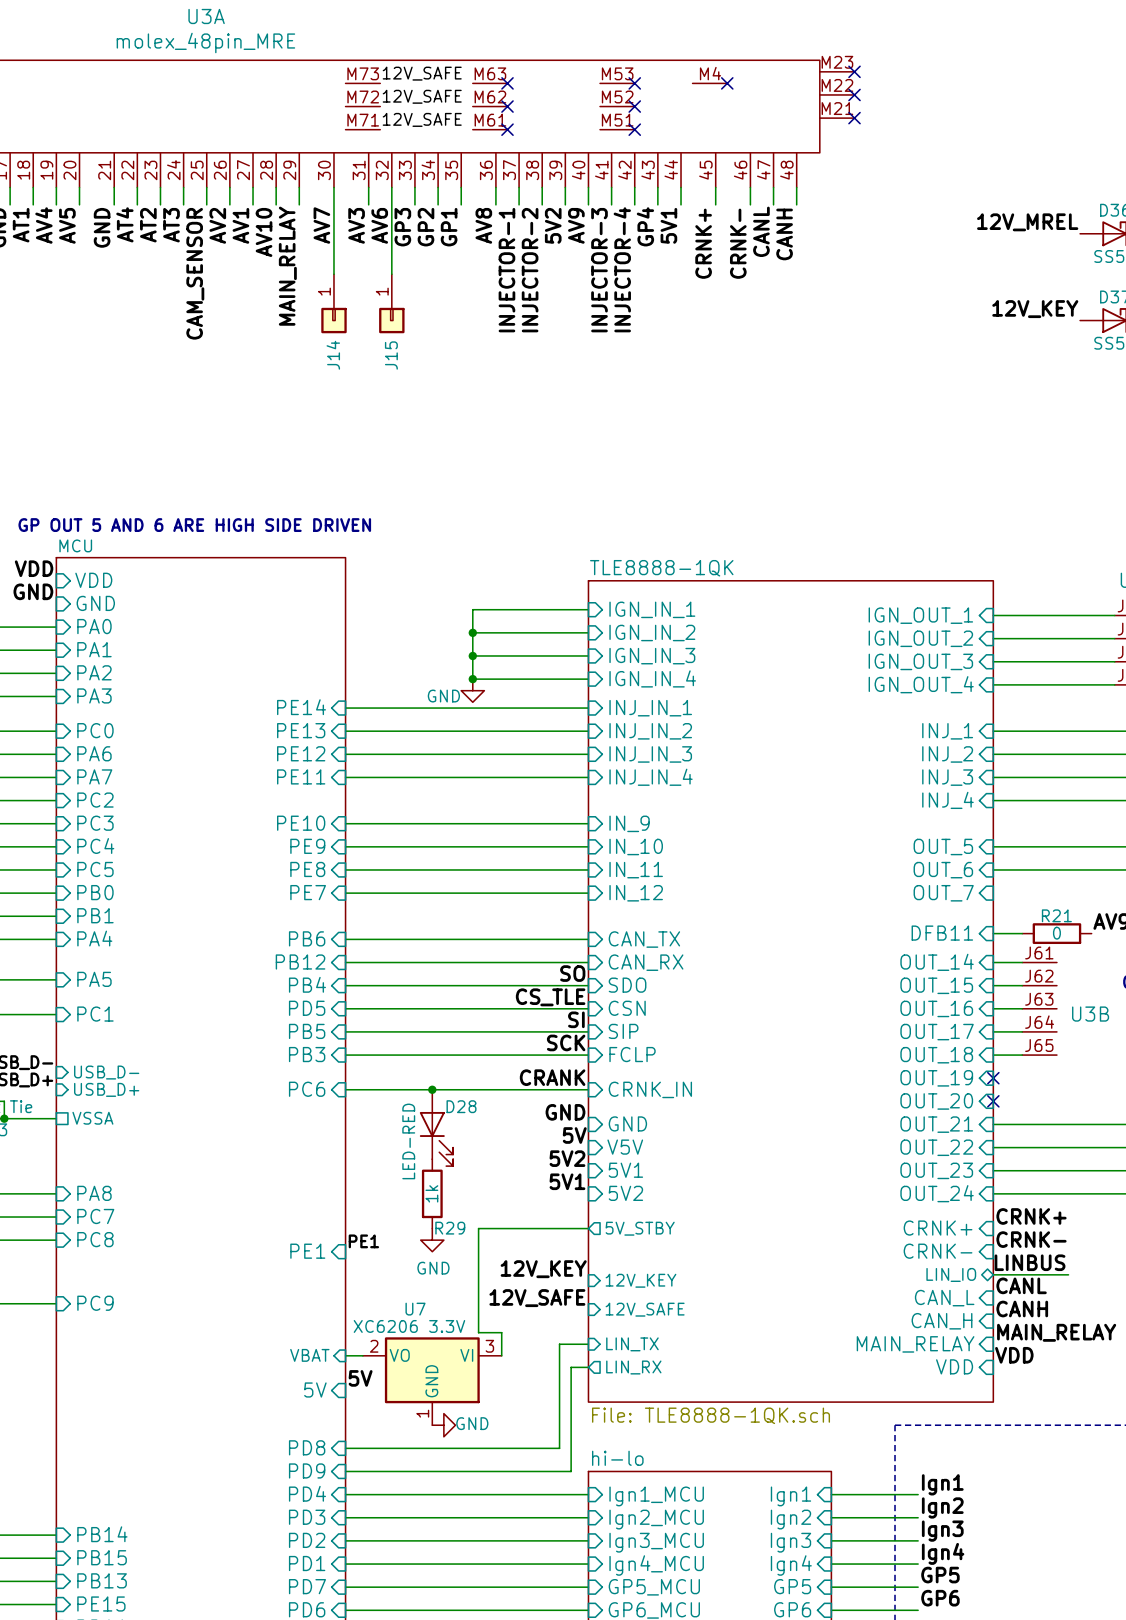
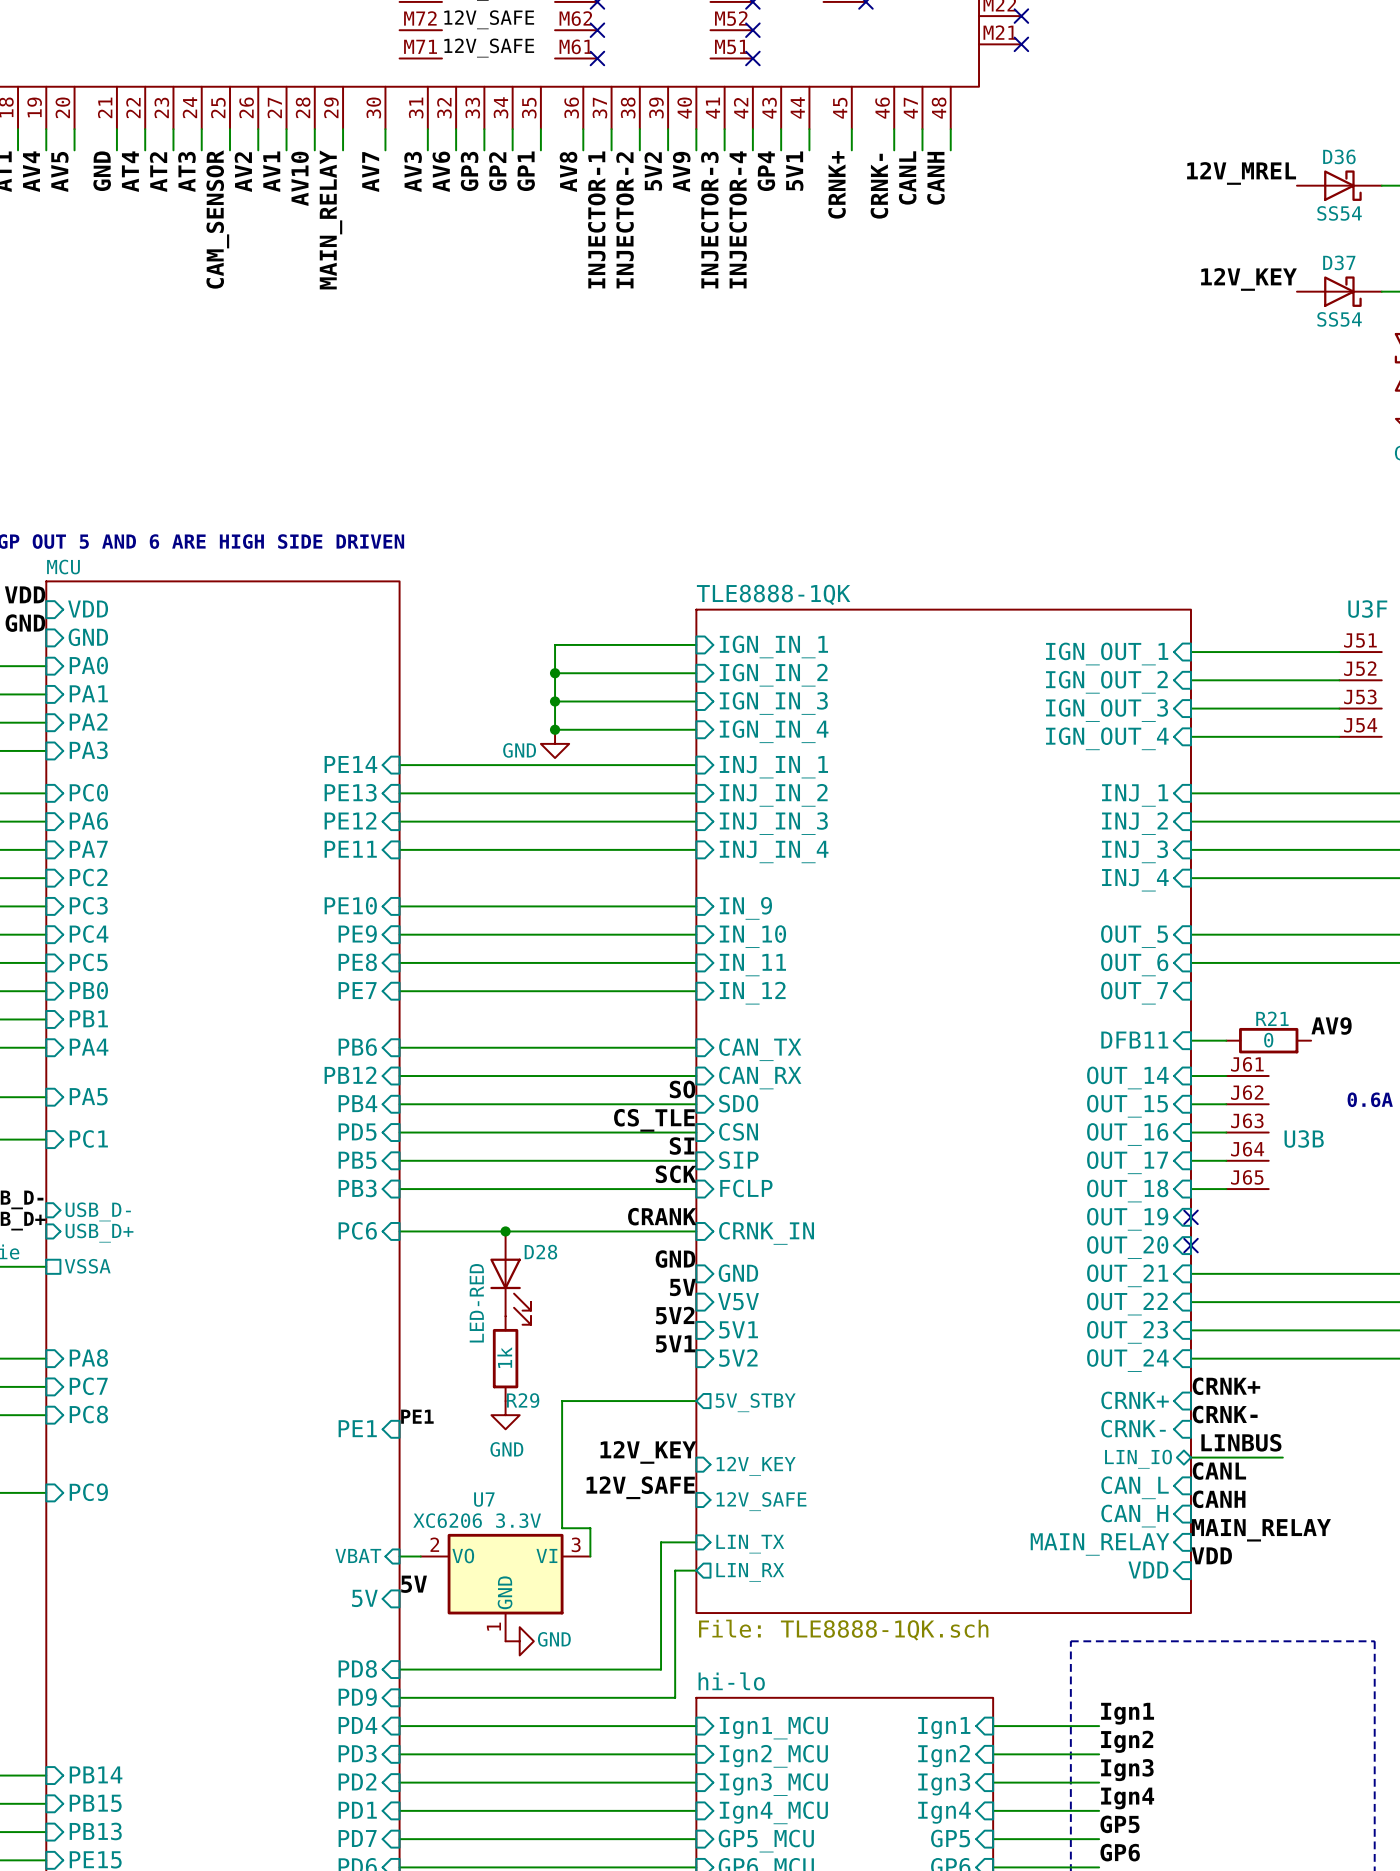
wire: (333, 204) (333, 274) -> none
wire: (391, 204) (391, 274) -> none
J14: (333, 303) -> none
J15: (391, 303) -> none

